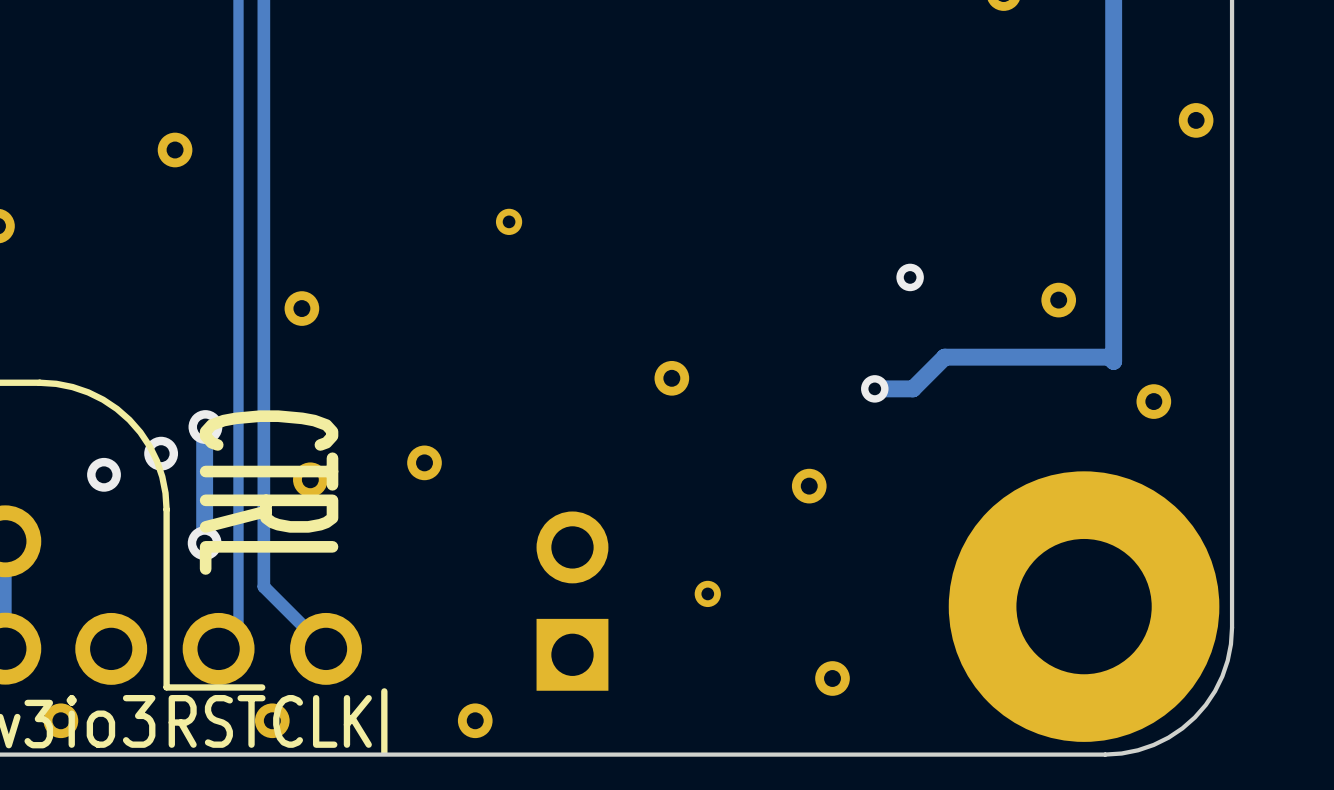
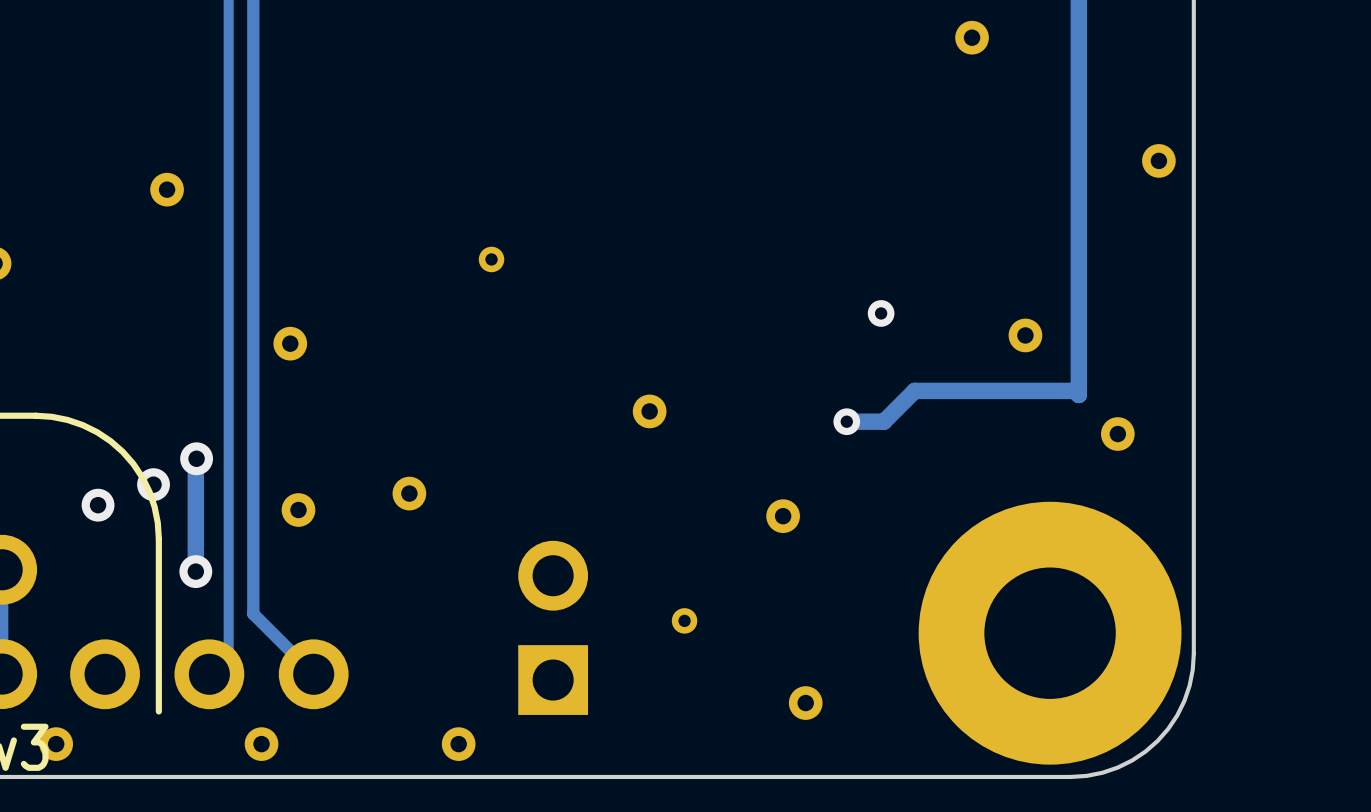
text: CTRL (269, 492) -> none
line: (384, 691) (384, 752) -> none
text: ~{RST} (214, 716) -> none
text: io3 (110, 721) -> none
text: CLK (322, 721) -> none

